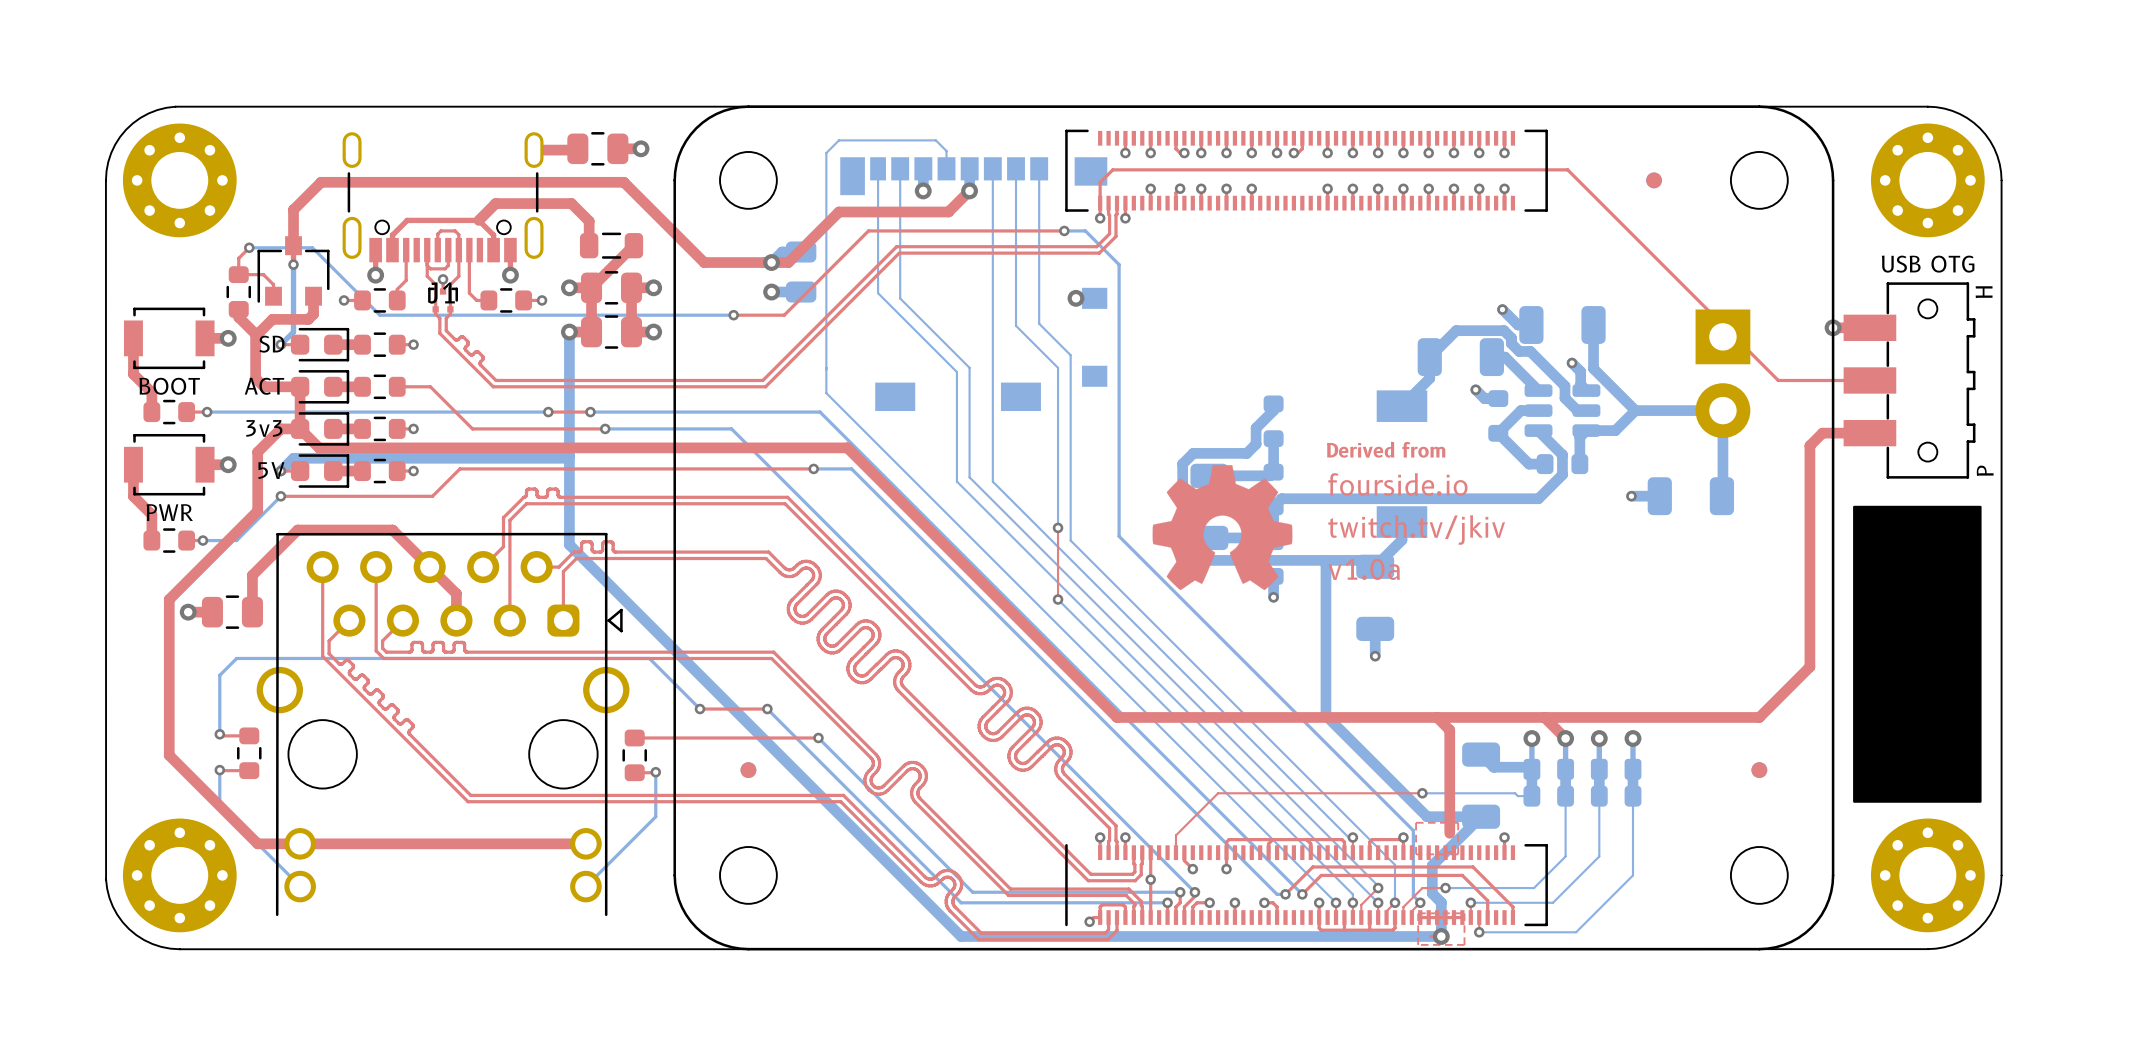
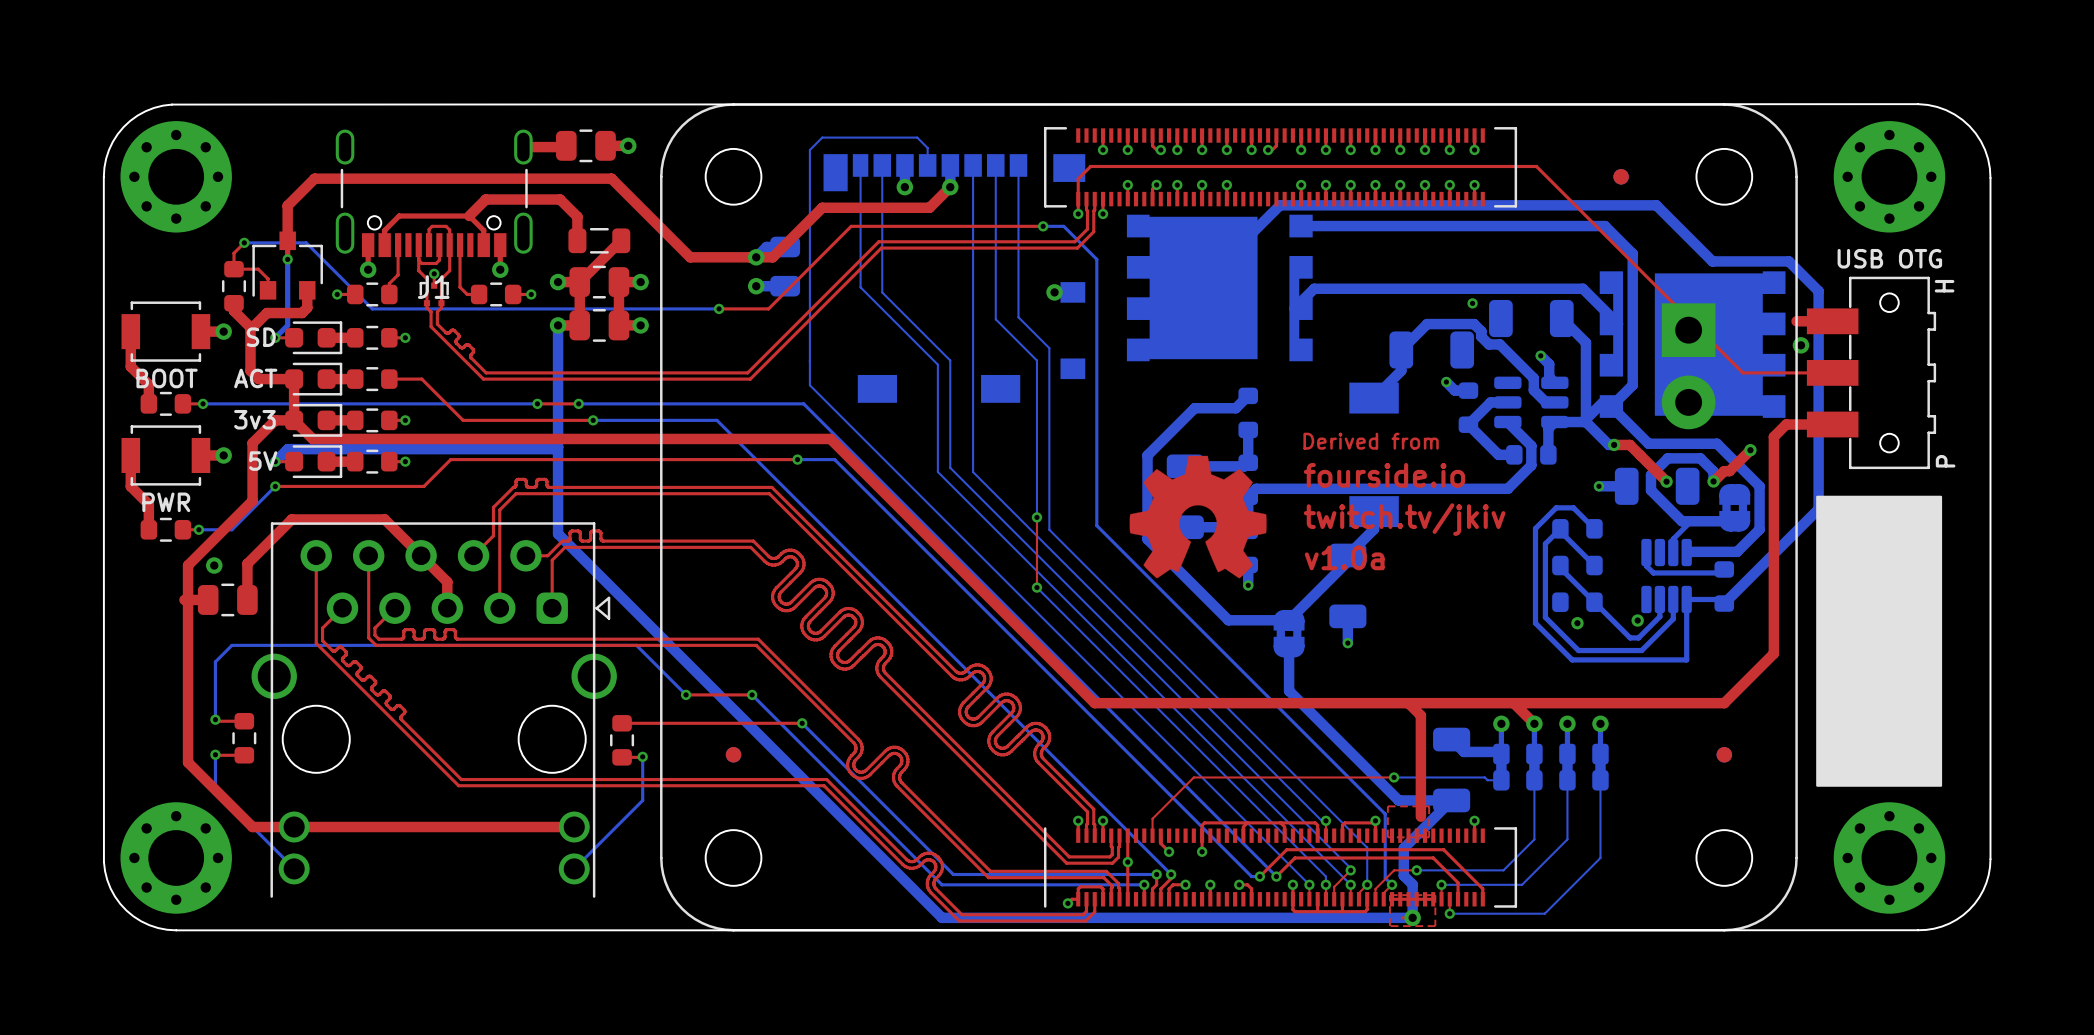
board edge: (175, 106) (1927, 106) (1944, 108) (1959, 113) (1973, 122) (1990, 141) (1999, 163) (2001, 180) (2001, 875) (1999, 891) (1994, 907) (1979, 927) (1967, 937) (1952, 944) (1927, 949) -> (172, 104) (1918, 104) (1946, 110) (1962, 119) (1975, 133) (1985, 150) (1990, 177) (1990, 867) (1986, 882) (1979, 897) (1969, 909) (1956, 919) (1934, 928) (1889, 930)
bottom track: none -> (1301, 226) (1604, 226) (1632, 253) (1632, 385) (1611, 406) (1648, 443) (1717, 443) (1759, 486) (1759, 529) (1737, 551) (1687, 552)
bottom track: none -> (1203, 287) (1203, 281) (1279, 205) (1656, 205) (1712, 261) (1788, 261) (1818, 291) (1818, 509) (1724, 603) (1720, 599) (1686, 599) (1686, 659)
part: none -> (1219, 287)
bottom track: (1502, 309) (1517, 325) (1531, 325) -> none
bottom track: none -> (1294, 308) (1314, 288) (1582, 288) (1618, 323)
bottom track: (1593, 325) (1593, 368) (1635, 410) (1722, 410) (1721, 496) -> (1561, 318) (1585, 342) (1585, 422) (1608, 444) (1614, 444)
via position: (1833, 327) -> (1800, 345)
part: none -> (1692, 344)
bottom track: (1491, 357) (1505, 357) (1538, 390) -> none
bottom track: (1273, 403) (1273, 410) (1256, 428) (1256, 444) (1246, 453) (1193, 453) (1182, 464) (1182, 549) (1193, 560) (1368, 560) -> (1248, 395) (1235, 408) (1194, 408) (1147, 455) (1147, 539) (1228, 620) (1289, 620) (1347, 561) (1347, 555)
top track: none -> (1614, 444) (1629, 444) (1666, 481)
via: none -> (1614, 444)
top track: none -> (1750, 450) (1729, 471) (1724, 471) (1713, 481)
via: none -> (1750, 450)
via: none -> (1666, 481)
bottom track: none -> (1713, 481) (1713, 471) (1700, 458) (1667, 458) (1651, 475) (1651, 490) (1681, 521) (1734, 521) (1691, 521) (1673, 539) (1673, 552)
via: none -> (1713, 481)
part: none -> (1734, 507)
part: none -> (1577, 528)
bottom track: none -> (1594, 528) (1573, 507) (1556, 507) (1535, 528) (1535, 623) (1572, 659) (1686, 659)
bottom track: (1325, 560) (1325, 715) -> (1289, 647) (1289, 690) (1299, 701)
bottom track: none -> (1646, 552) (1646, 565) (1653, 572) (1720, 572) (1724, 569)
top track: (191, 576) (169, 599) (169, 755) (191, 777) -> (188, 565) (188, 762)
bottom track: none -> (1560, 565) (1560, 568) (1630, 637) (1638, 637) (1659, 616) (1659, 599)
part: none -> (1577, 565)
bottom track: none -> (1594, 565) (1560, 531) (1560, 528) (1545, 543) (1545, 617) (1578, 650) (1641, 650) (1673, 618) (1673, 599)
part: none -> (1666, 576)
part: none -> (1724, 586)
via position: (188, 612) -> (214, 565)
part: none -> (1577, 602)
via: none -> (1637, 620)
via: none -> (1577, 623)
part: none -> (1289, 633)

